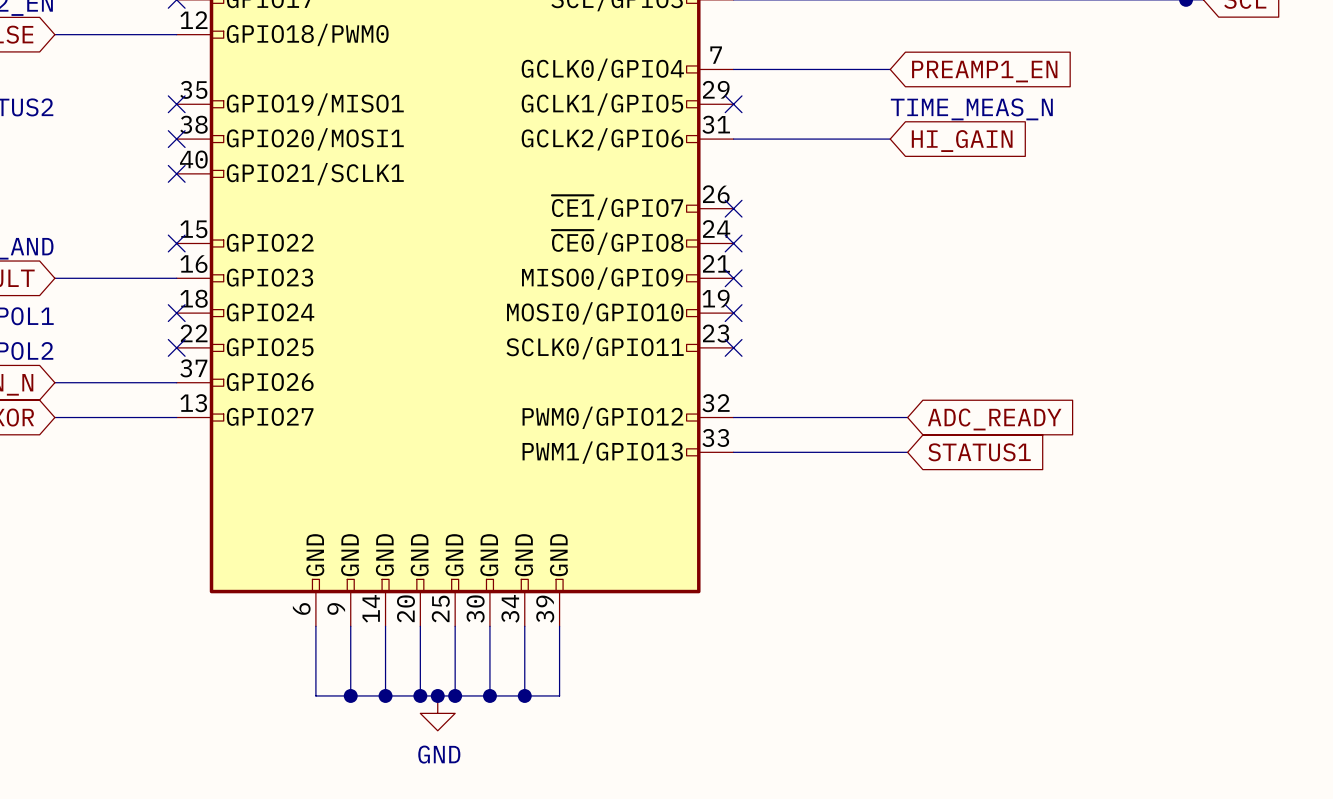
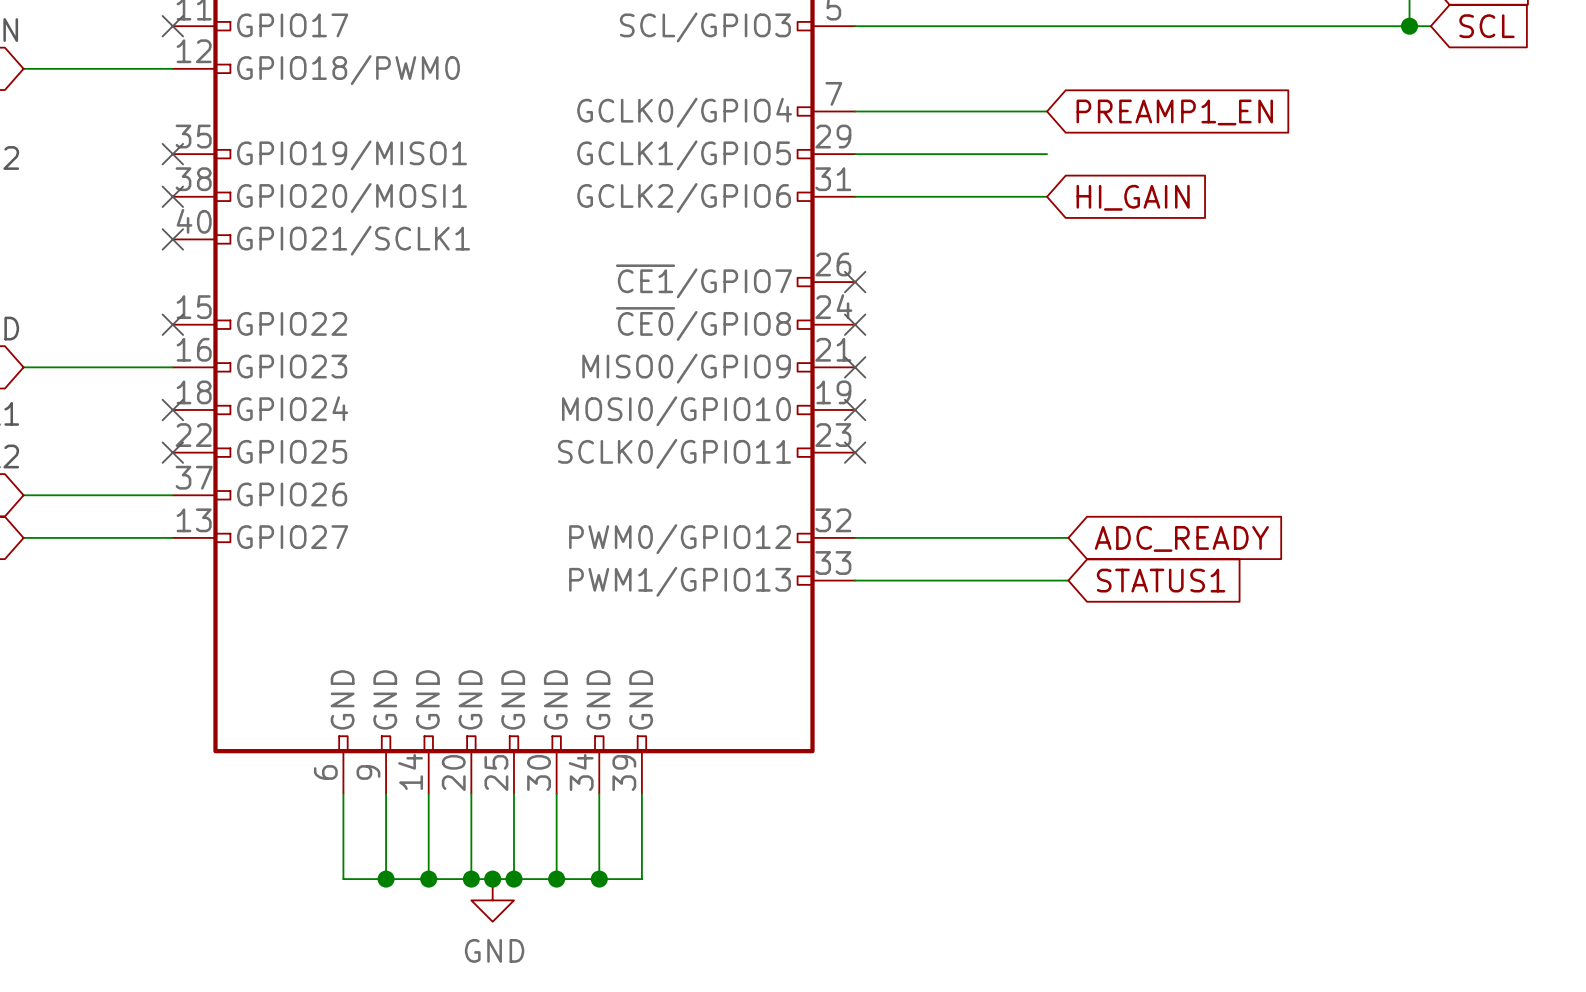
wire: none -> (855, 154) (1047, 154)
no-connect mark: (733, 104) -> none
text: TIME_MEAS_N (971, 109) -> none

